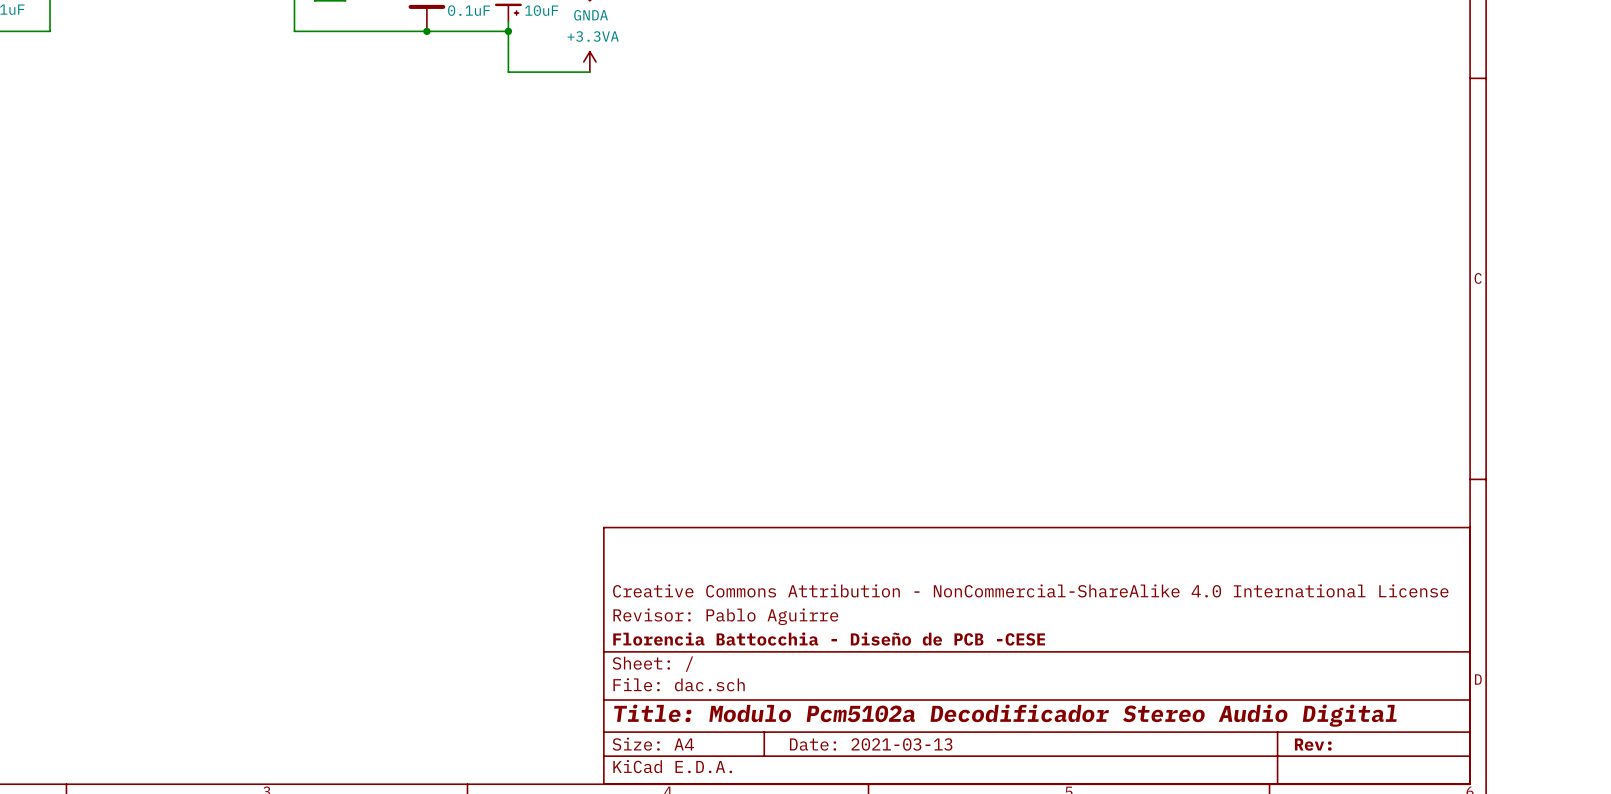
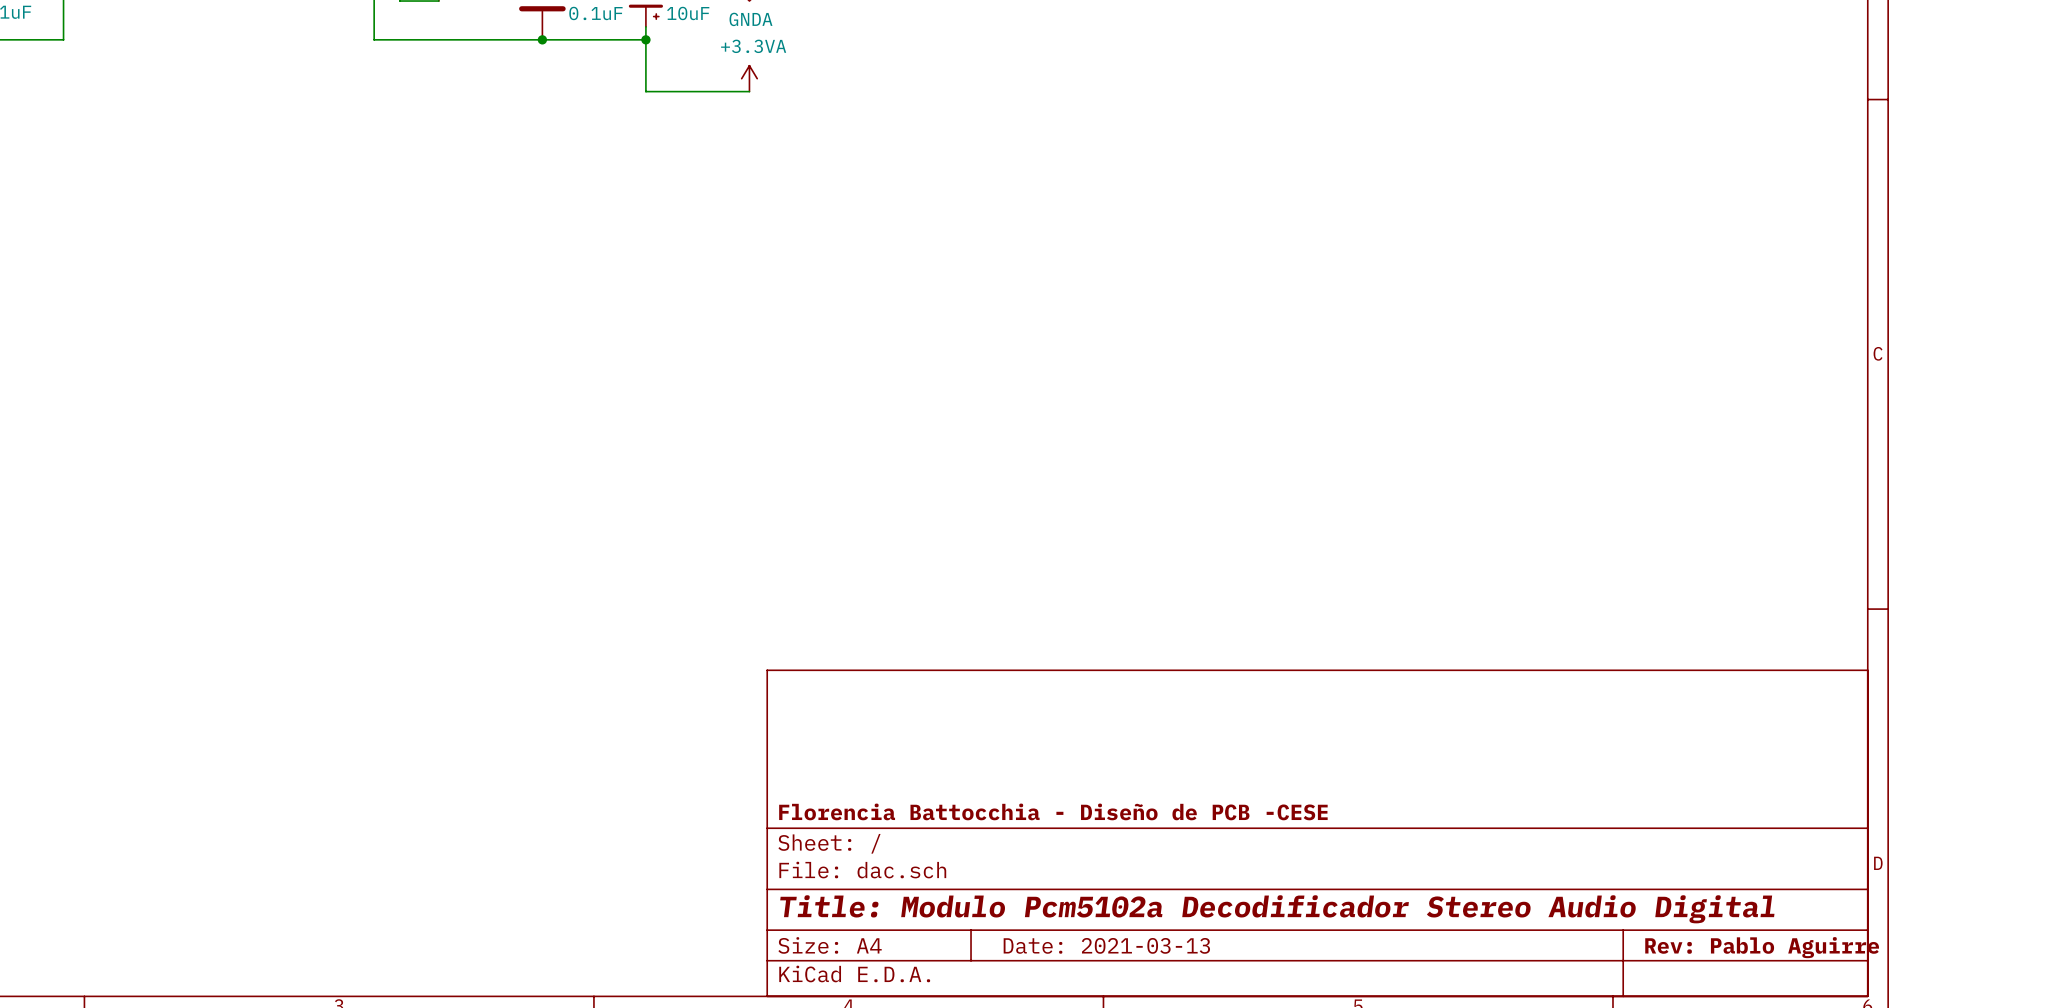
title block: Creative Commons Attribution - NonCommercial-ShareAlike 4.0 International License (1030, 590) -> none
title block: Revisor: Pablo Aguirre (725, 616) -> none
title block: Rev: (1313, 744) -> Rev: Pablo Aguirre (1762, 947)

